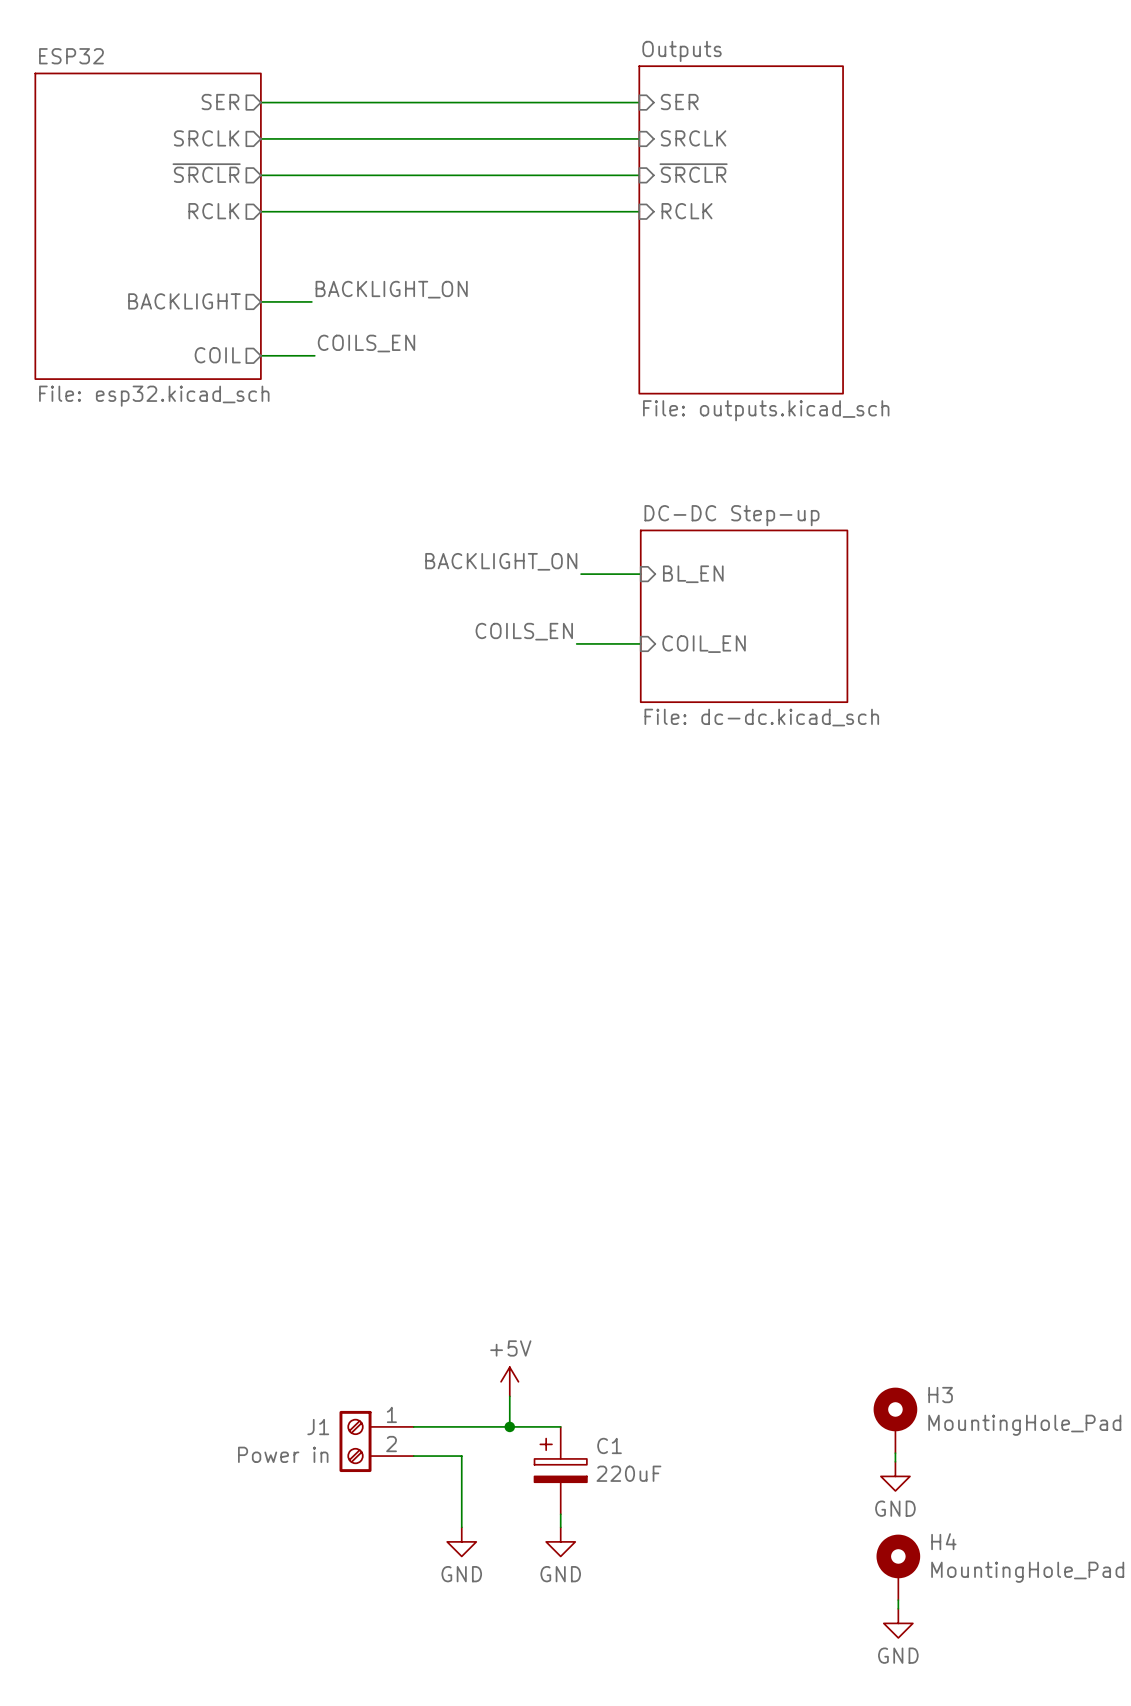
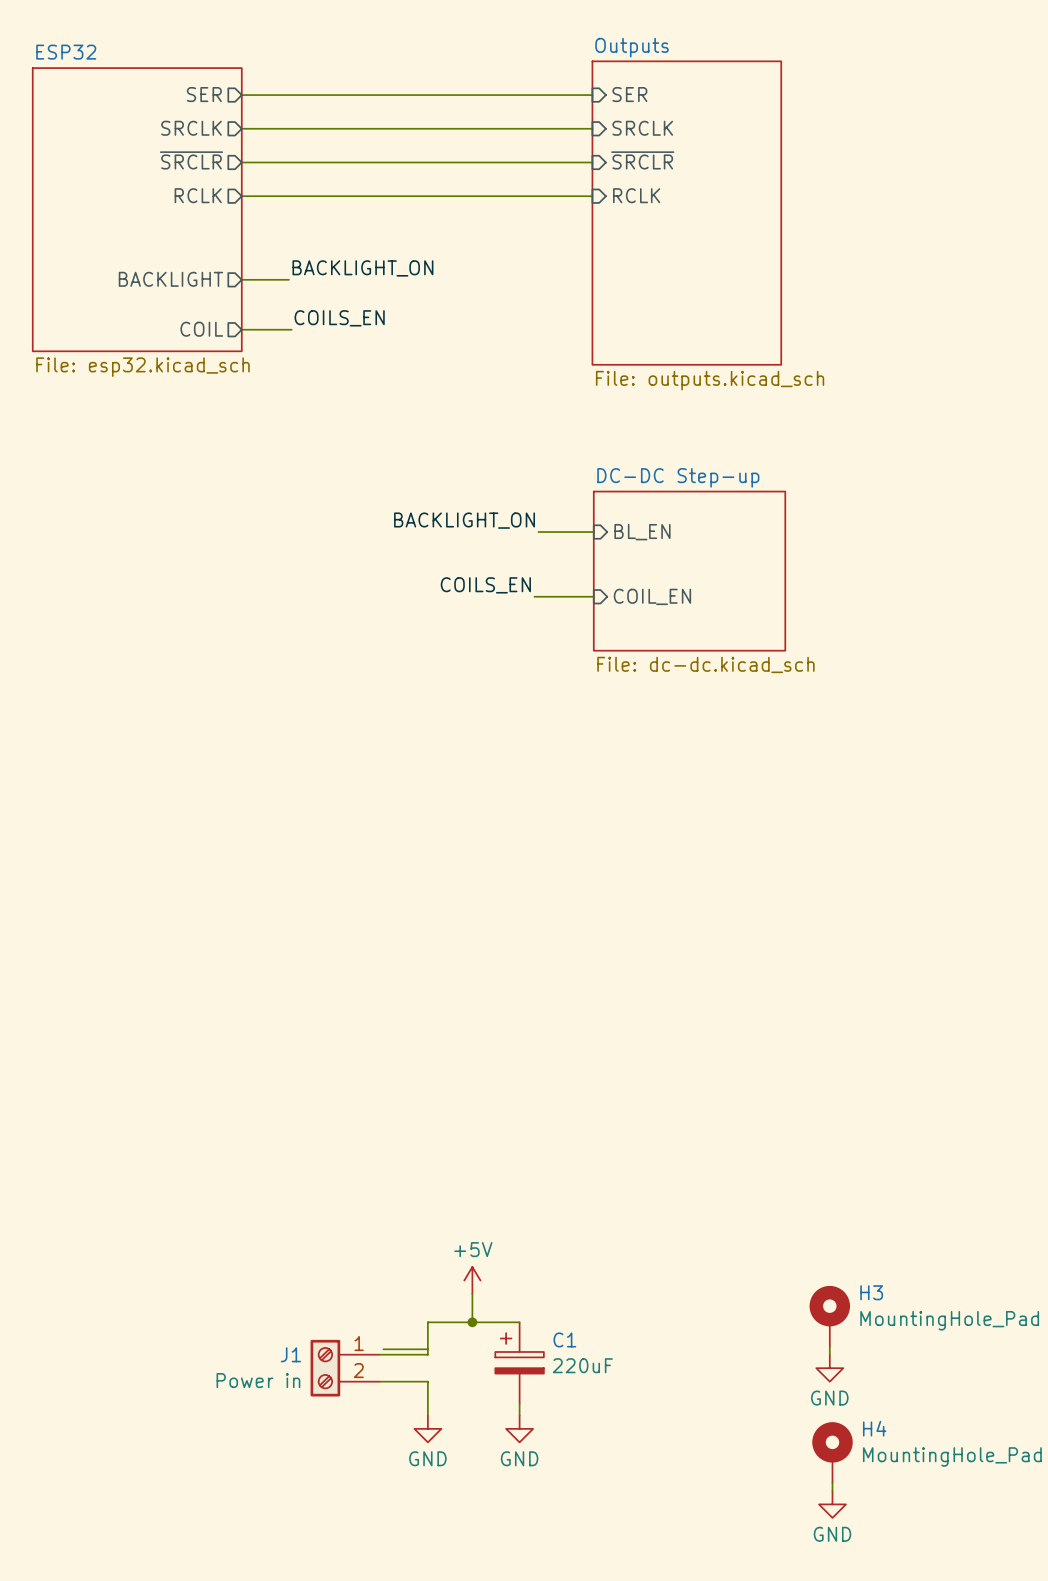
wire: (413, 1426) (461, 1426) -> (427, 1349) (427, 1322)
J1 position: (376, 1441) -> (344, 1368)
wire: (461, 1461) (461, 1490) -> (427, 1354) (379, 1354)
wire: none -> (379, 1381) (427, 1381)

